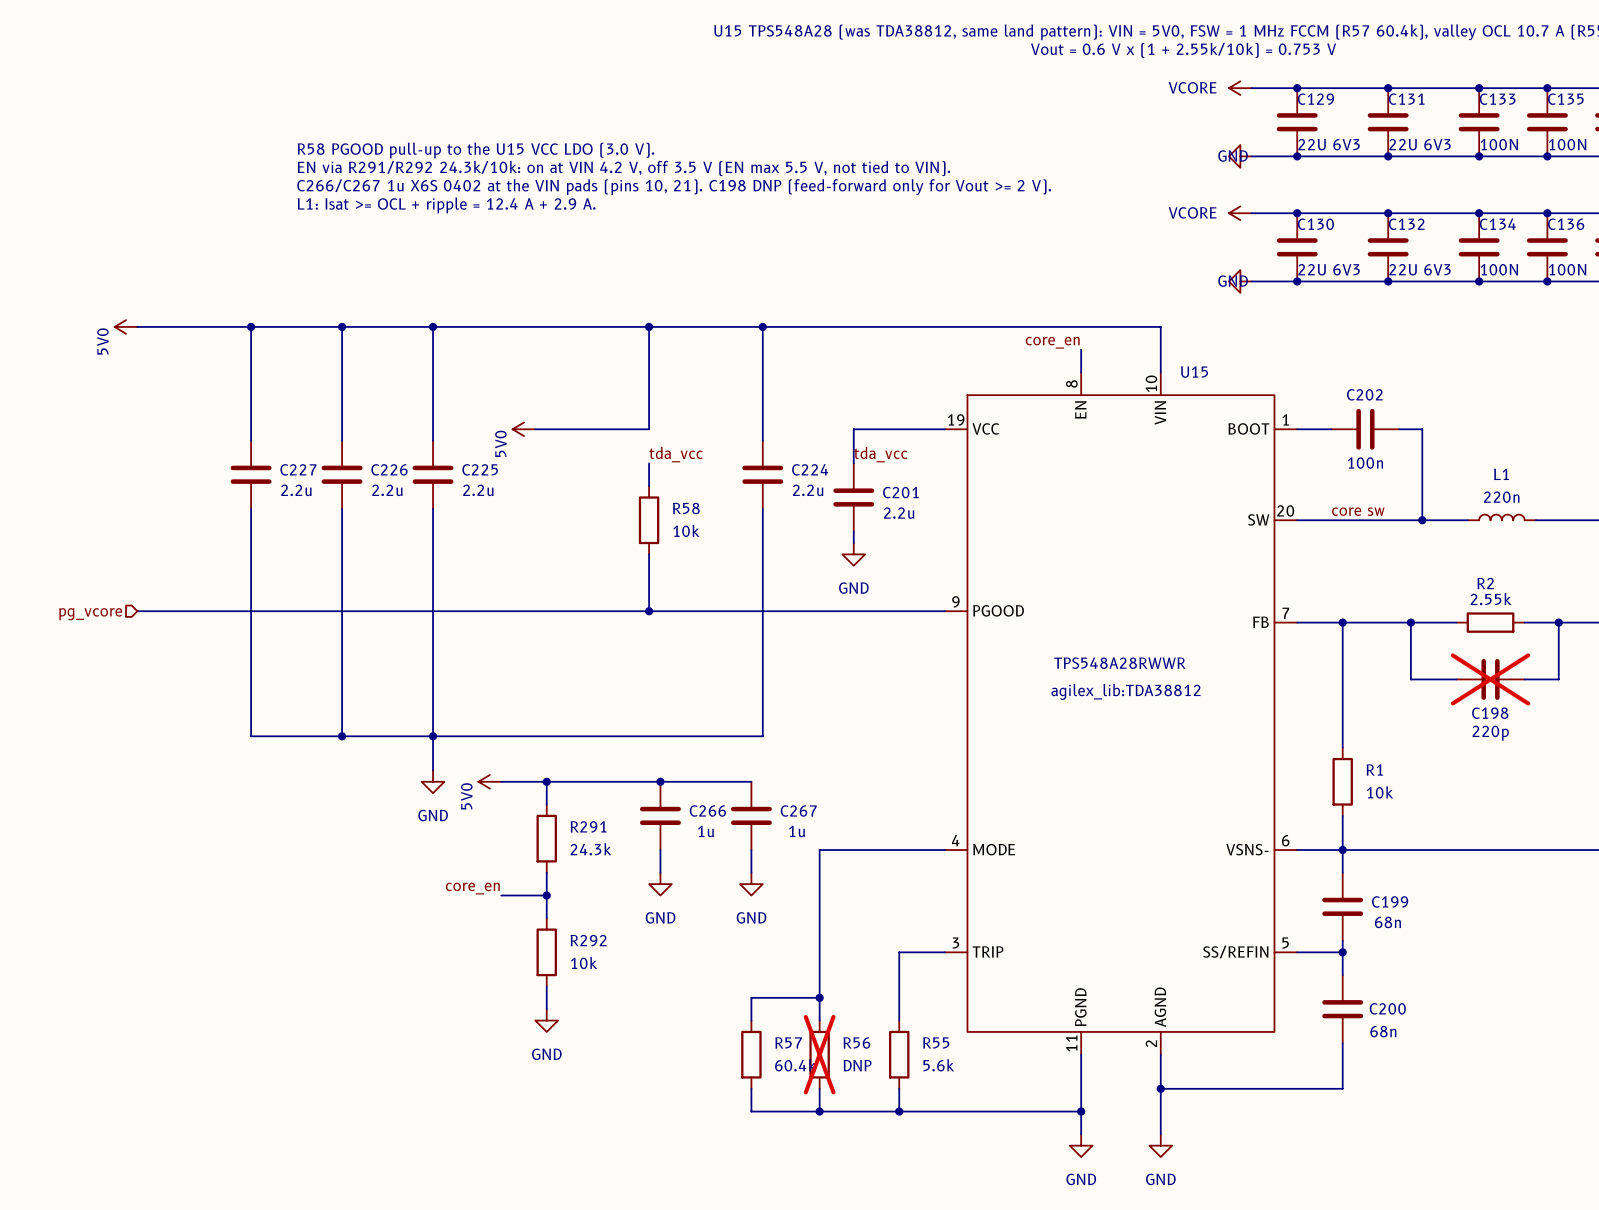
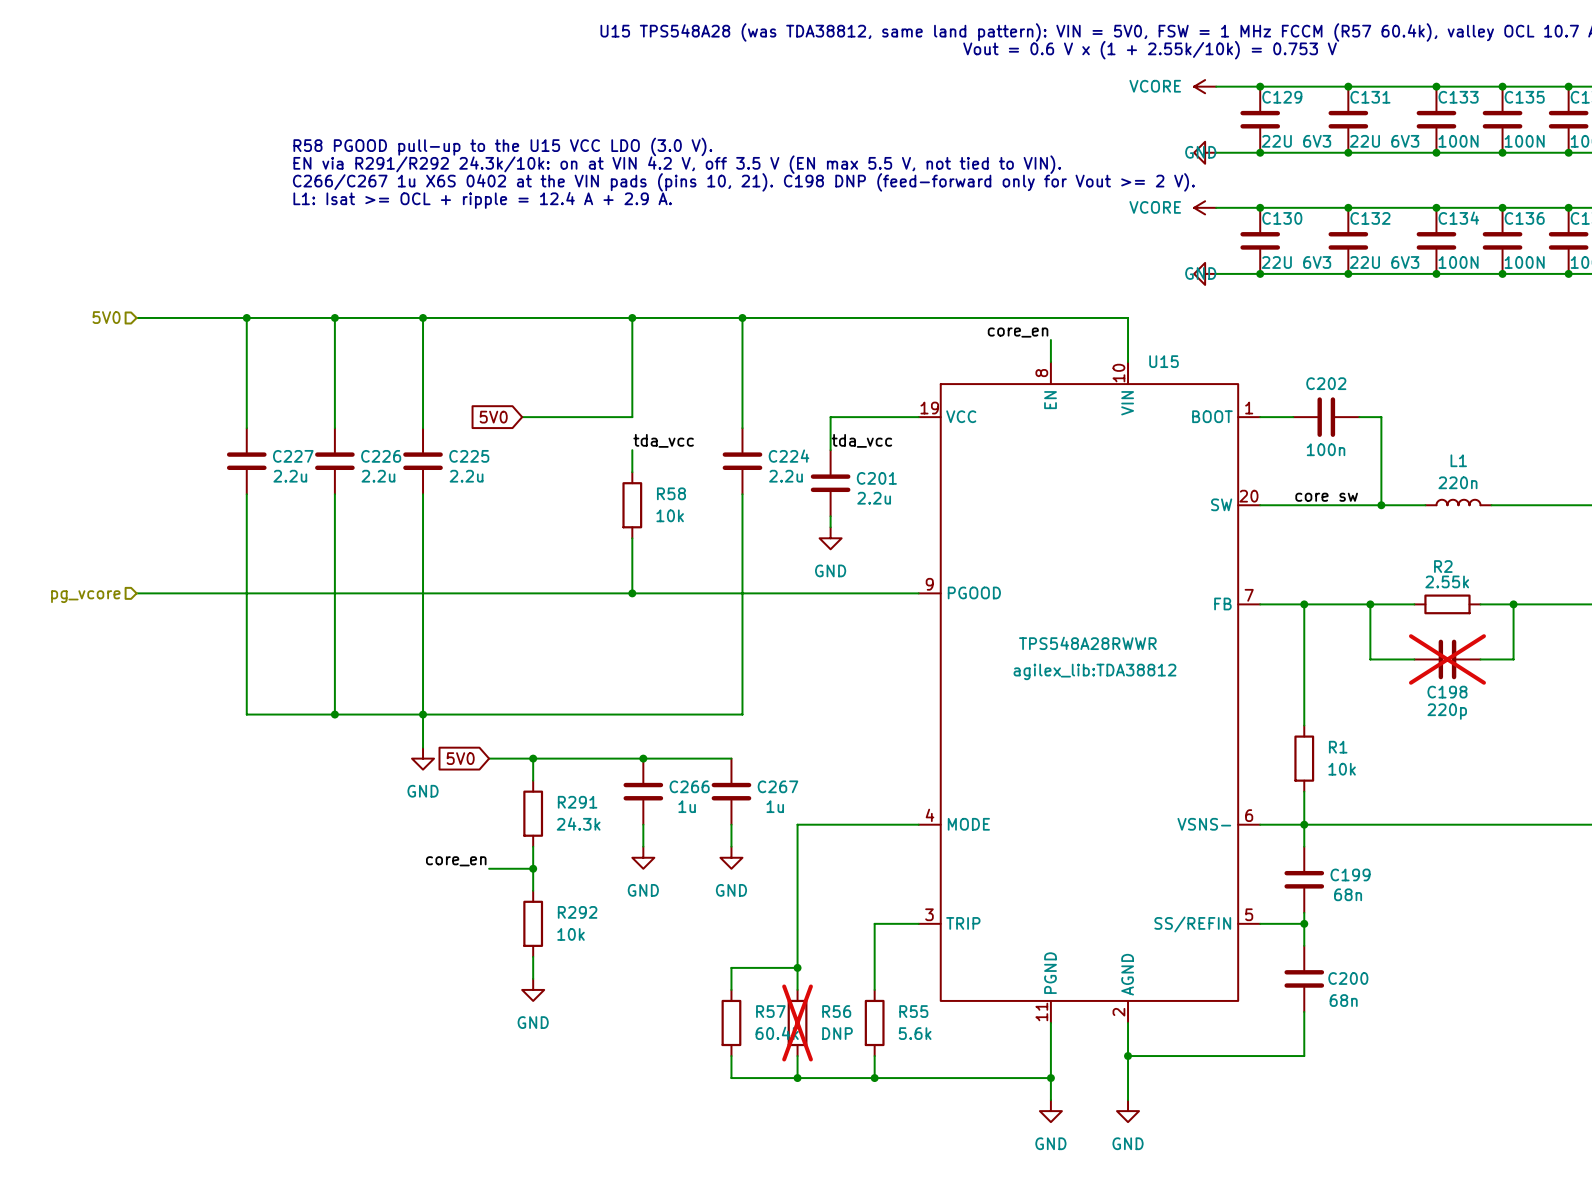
hierarchical label: none -> 5V0 (106, 317)
power symbol: 5V0 (126, 326) -> none
global label: none -> 5V0 (493, 417)
power symbol: 5V0 (523, 429) -> none
global label: none -> 5V0 (460, 758)
power symbol: 5V0 (489, 781) -> none

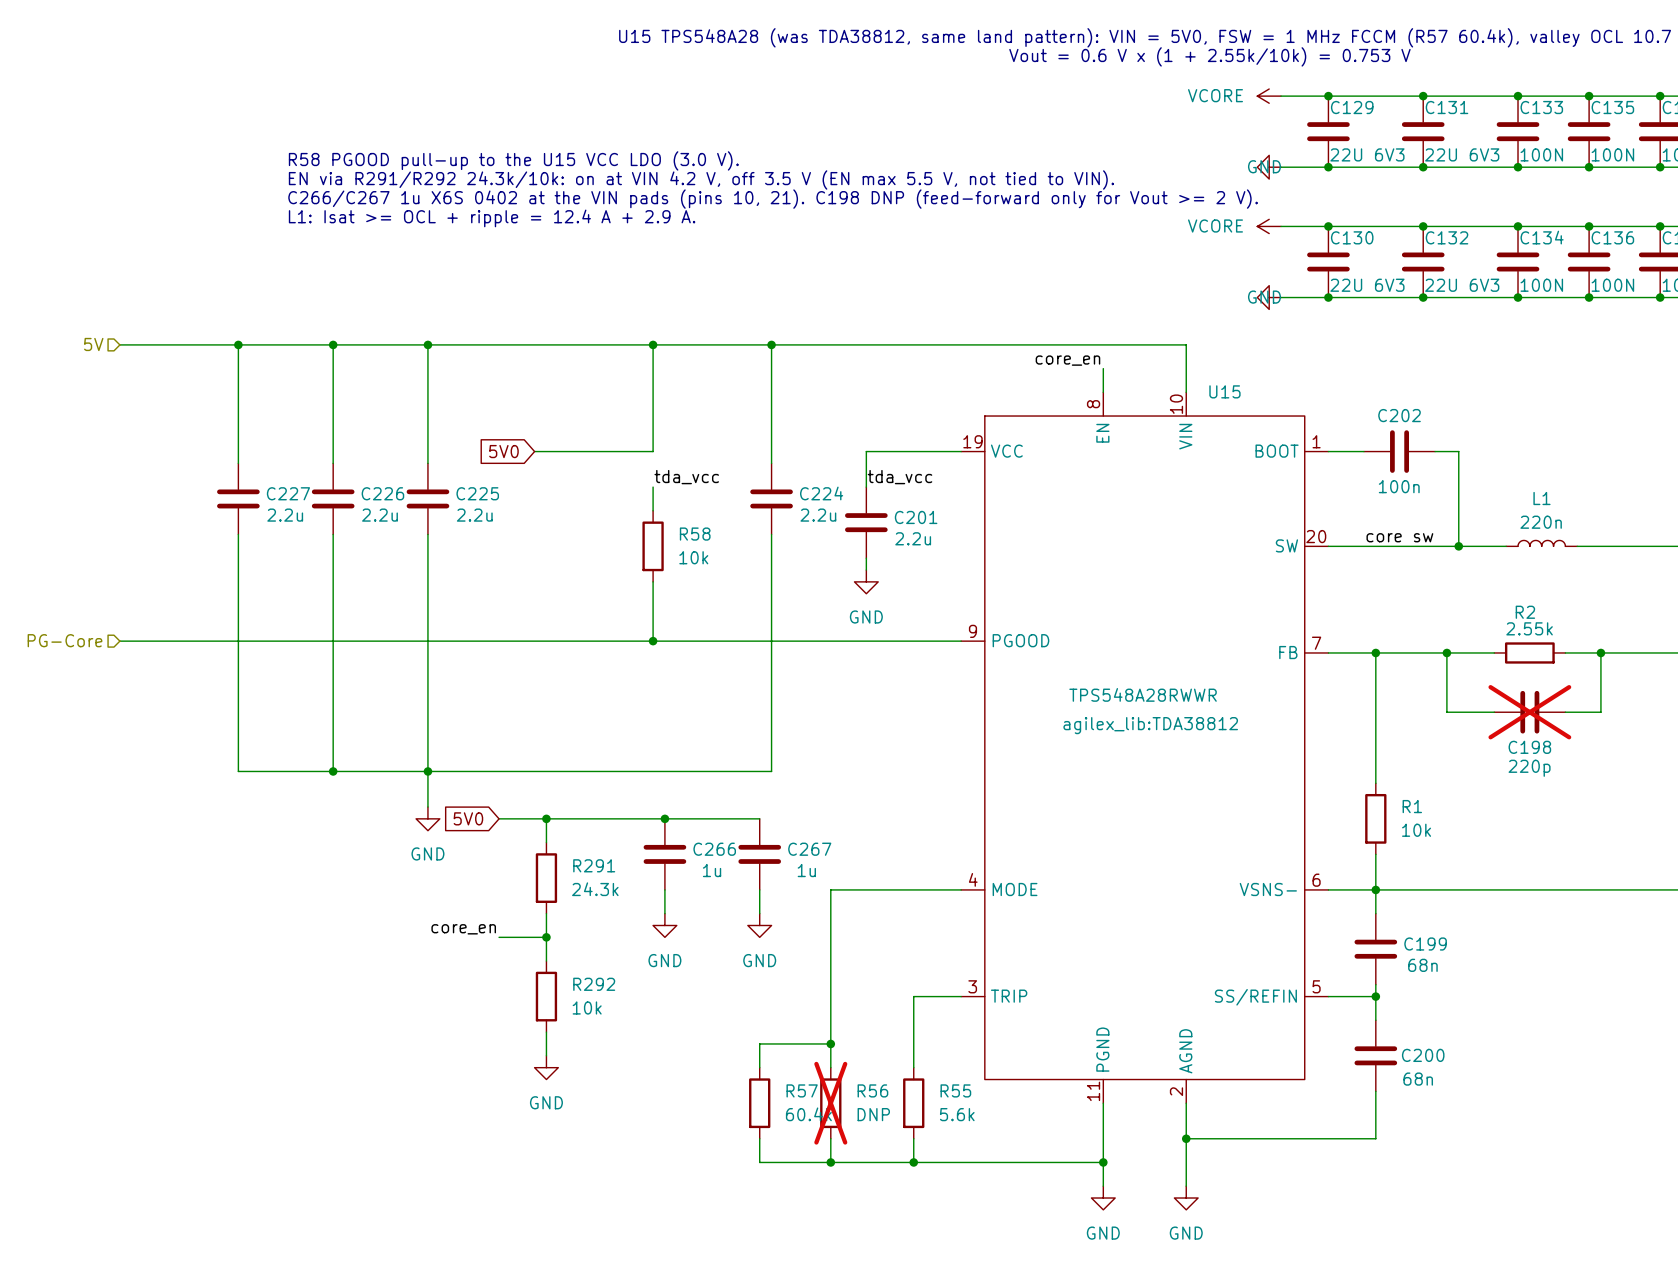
hierarchical label: 5V0 (106, 317) -> 5V (93, 344)
hierarchical label: pg_vcore (85, 596) -> PG-Core (64, 640)

